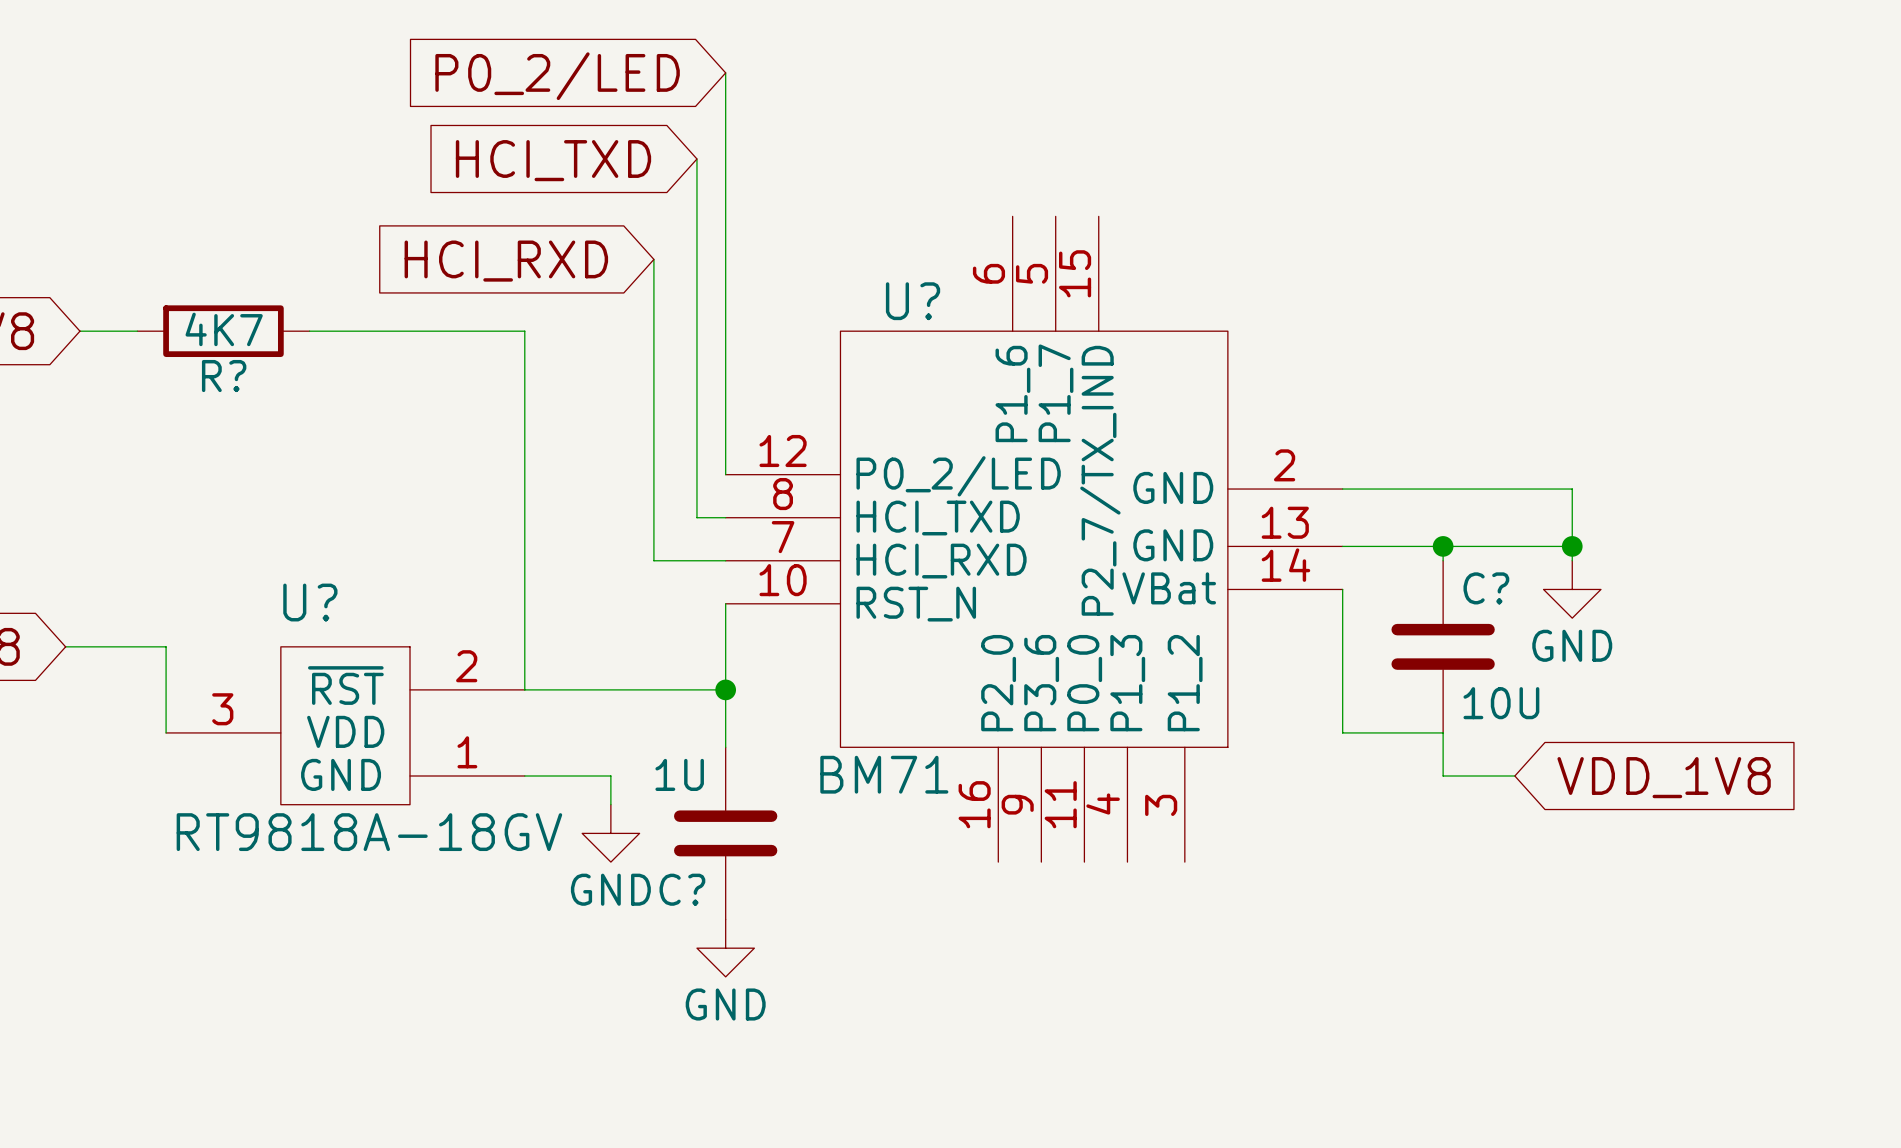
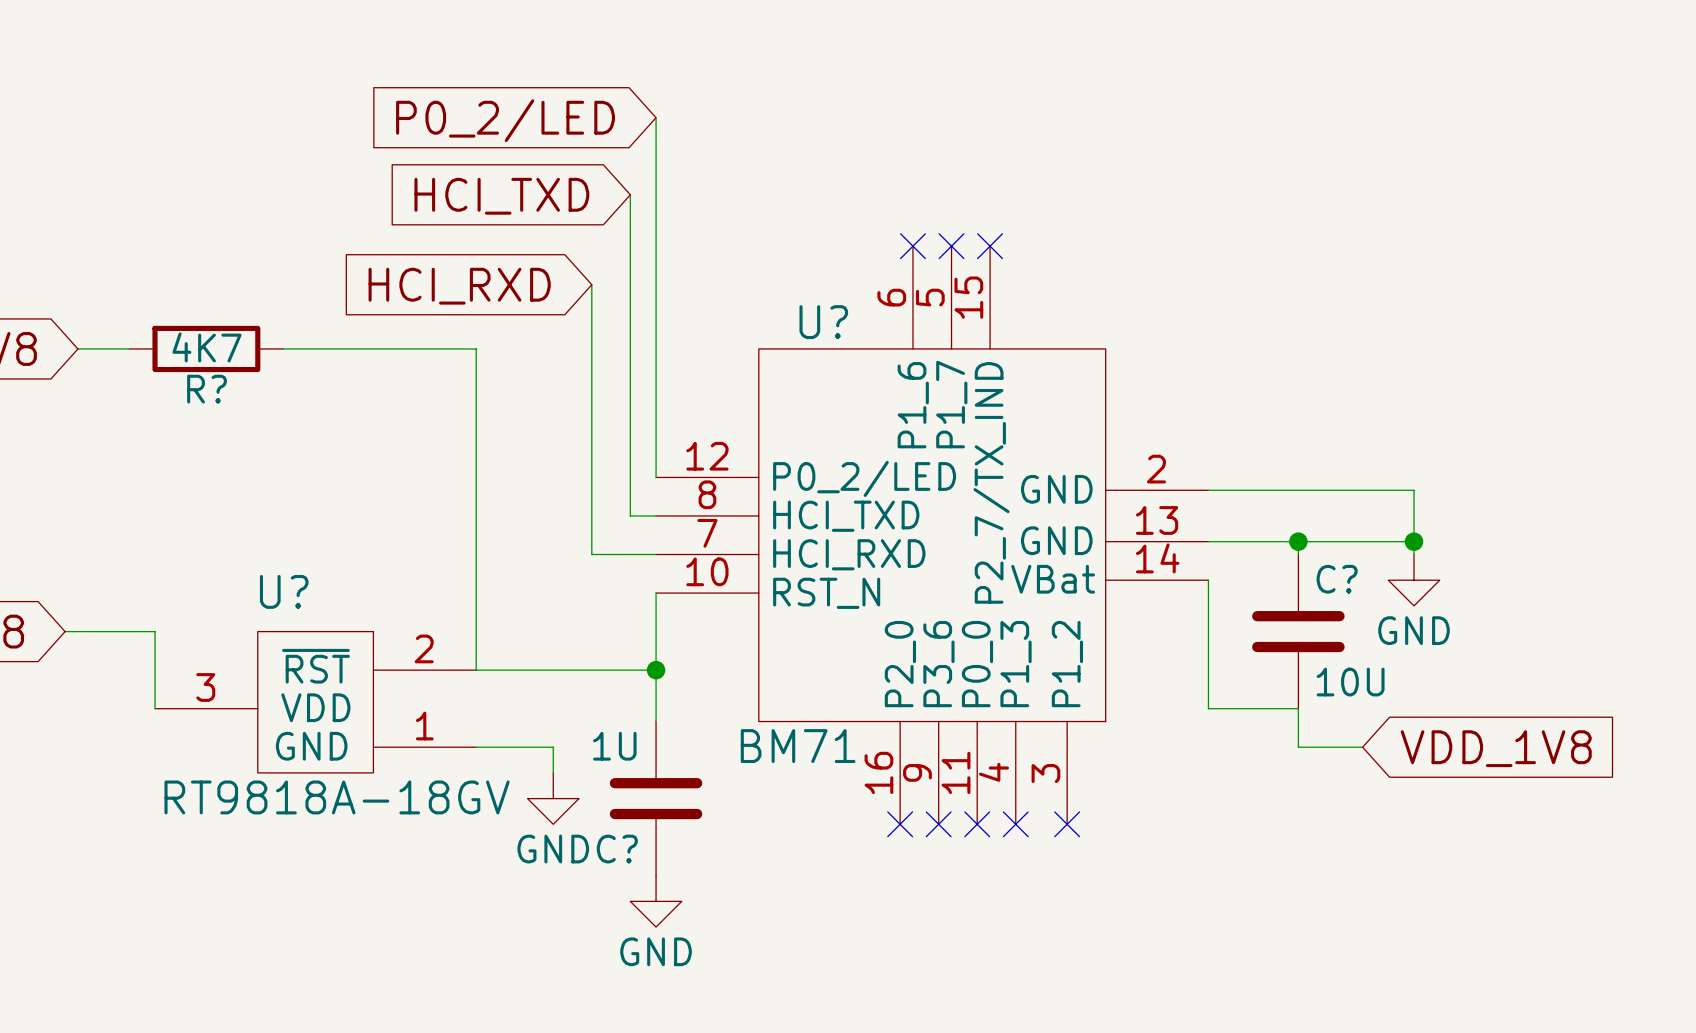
no-connect mark: none -> (912, 246)
no-connect mark: none -> (951, 246)
no-connect mark: none -> (990, 246)
no-connect mark: none -> (900, 824)
no-connect mark: none -> (938, 824)
no-connect mark: none -> (977, 824)
no-connect mark: none -> (1015, 824)
no-connect mark: none -> (1067, 824)

